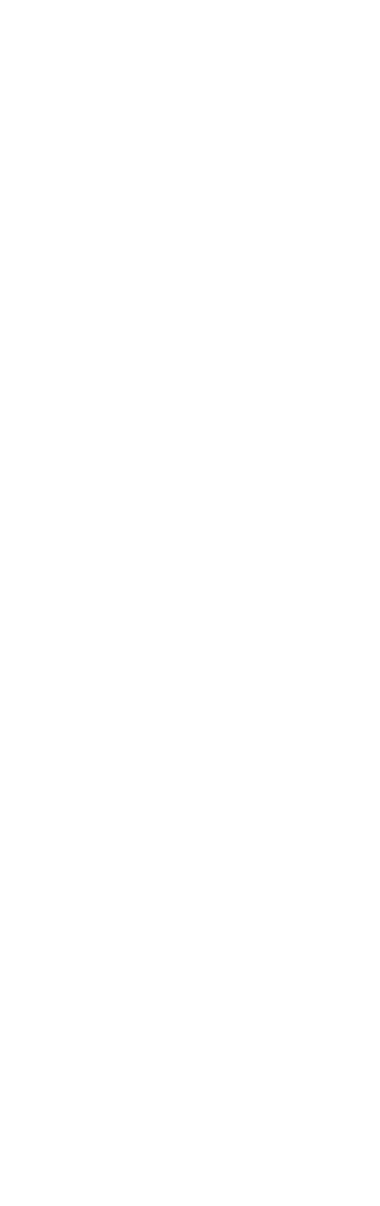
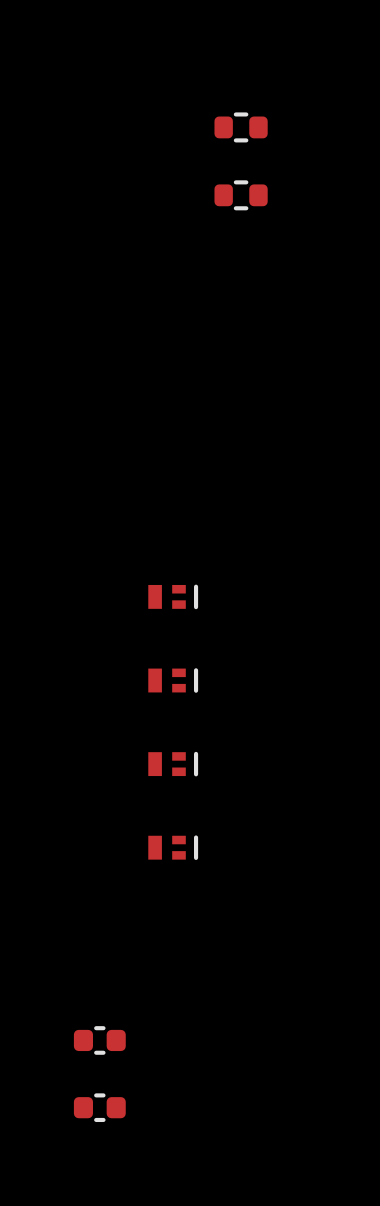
part: none -> (241, 127)
part: none -> (241, 195)
part: none -> (173, 596)
part: none -> (173, 680)
part: none -> (173, 764)
part: none -> (173, 847)
part: none -> (99, 1040)
part: none -> (99, 1107)

